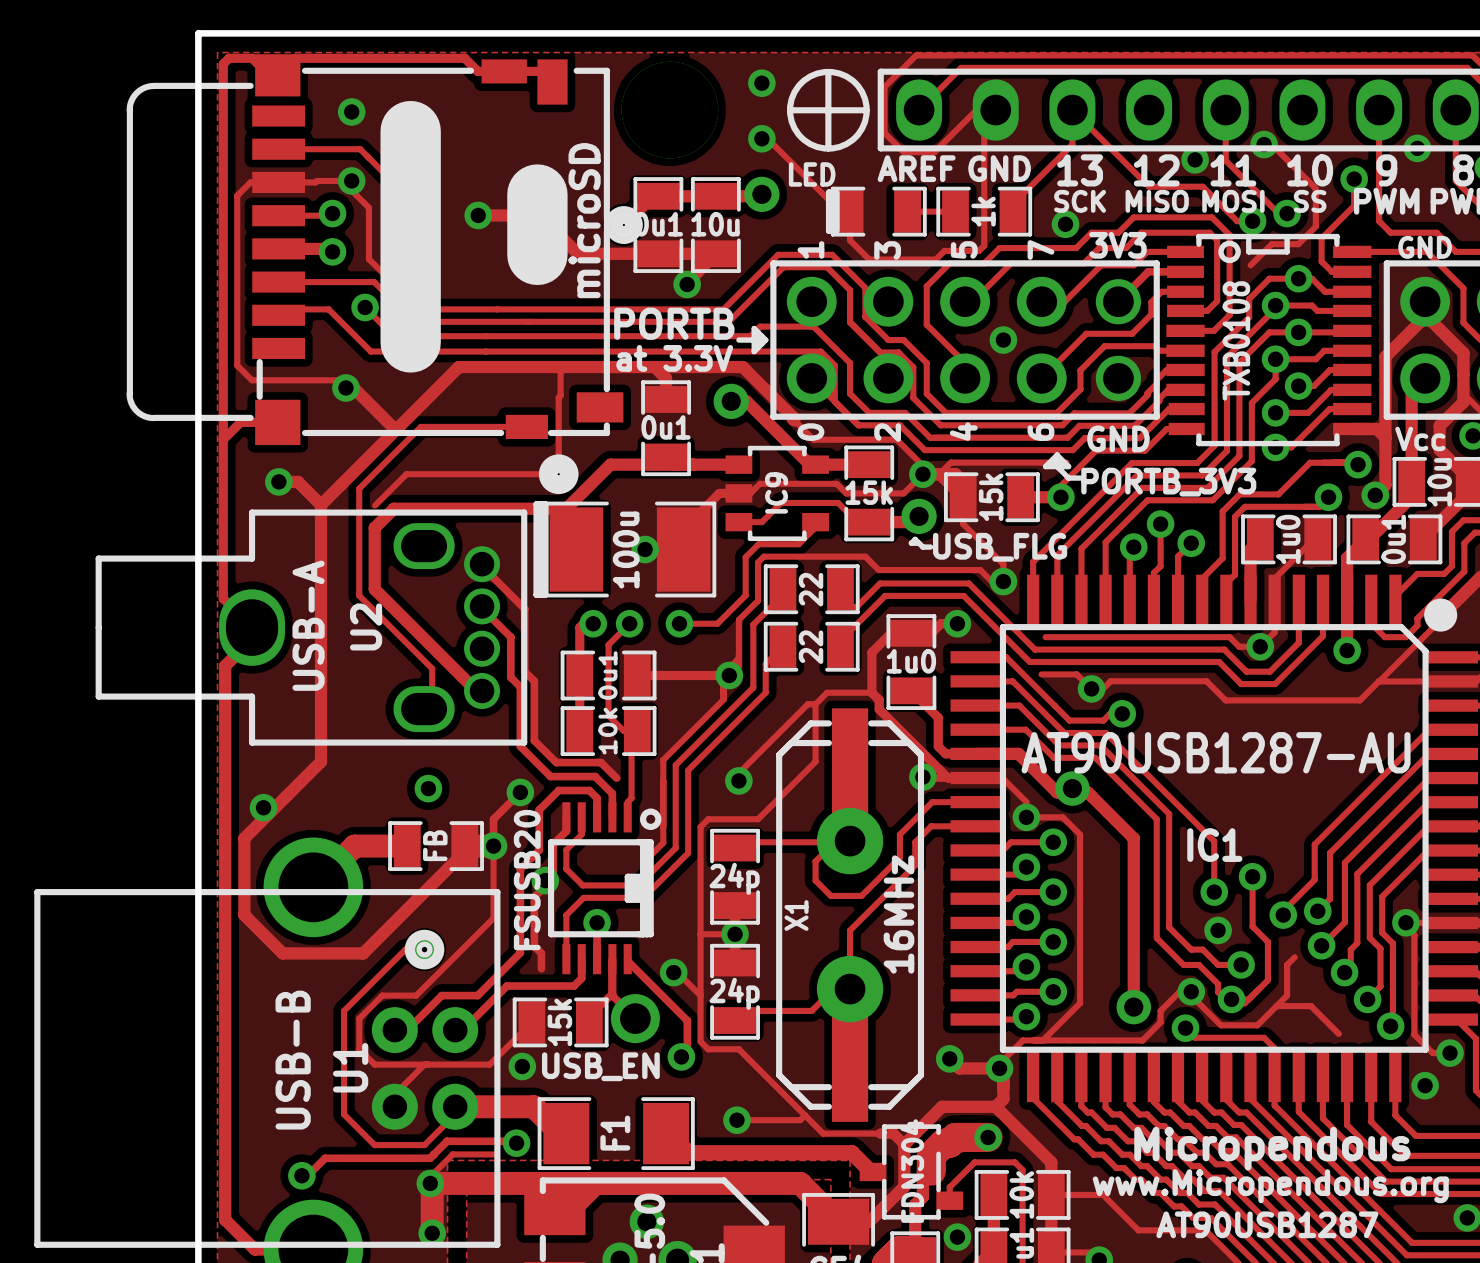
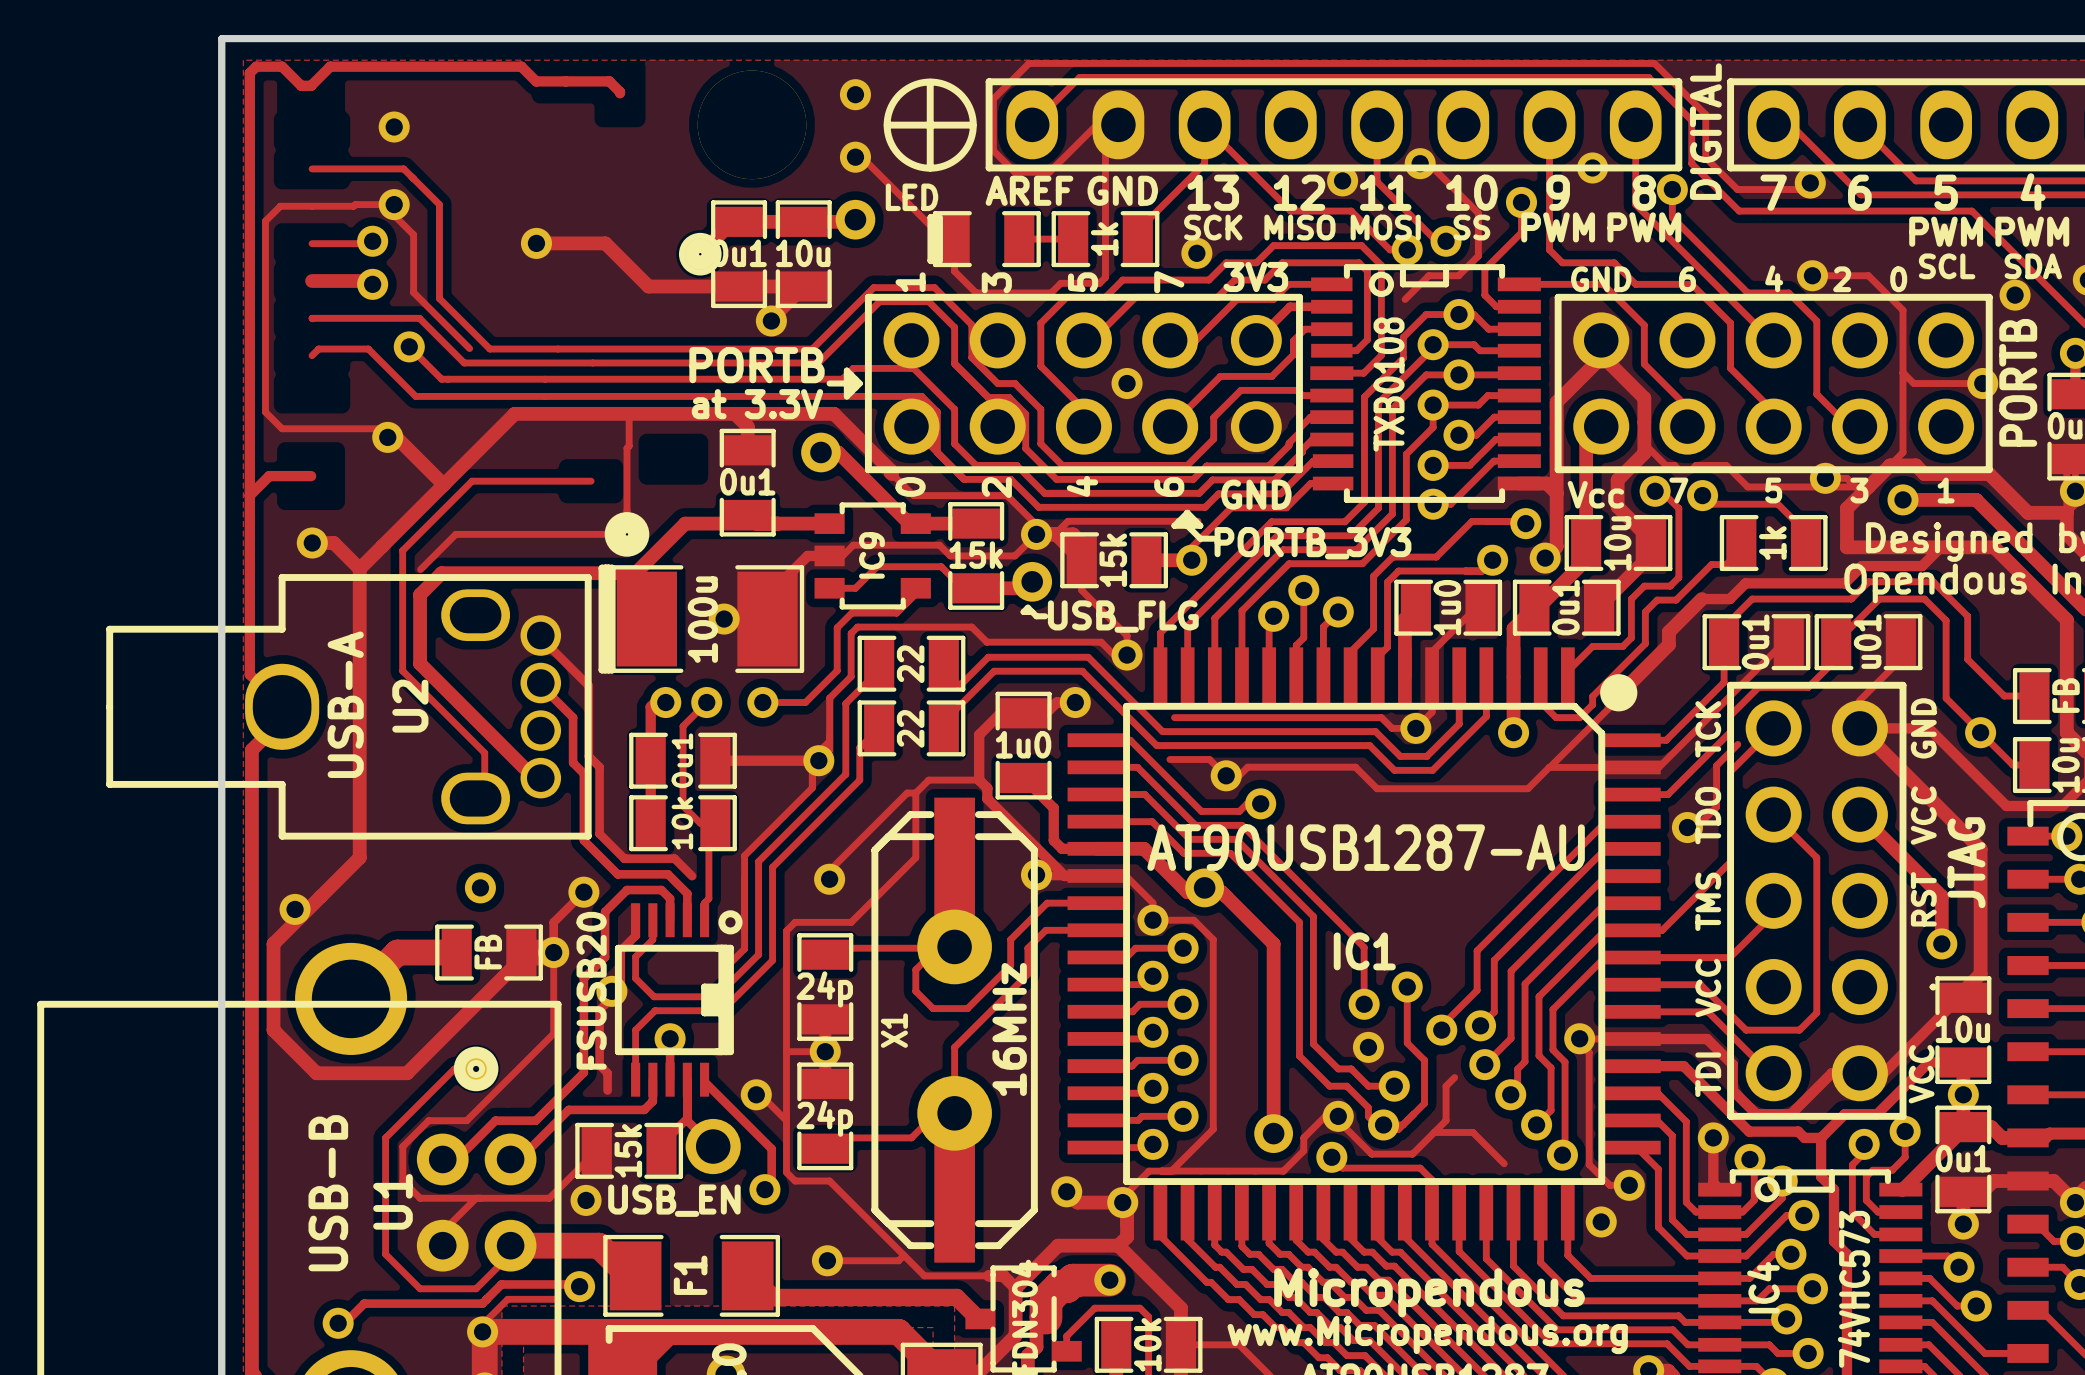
part: microSD (374, 249) -> none

